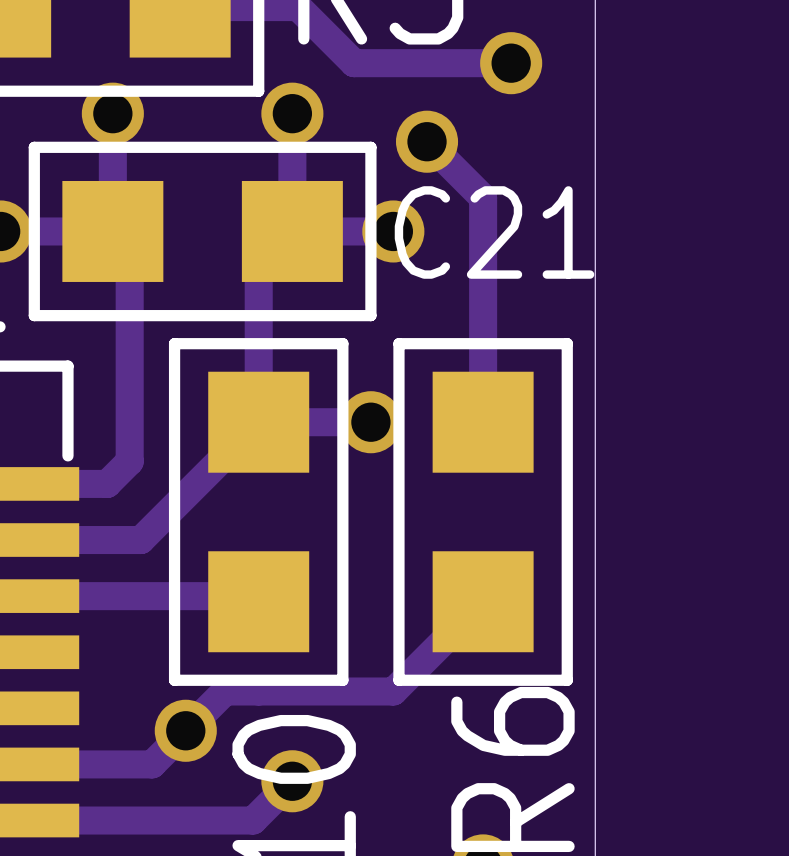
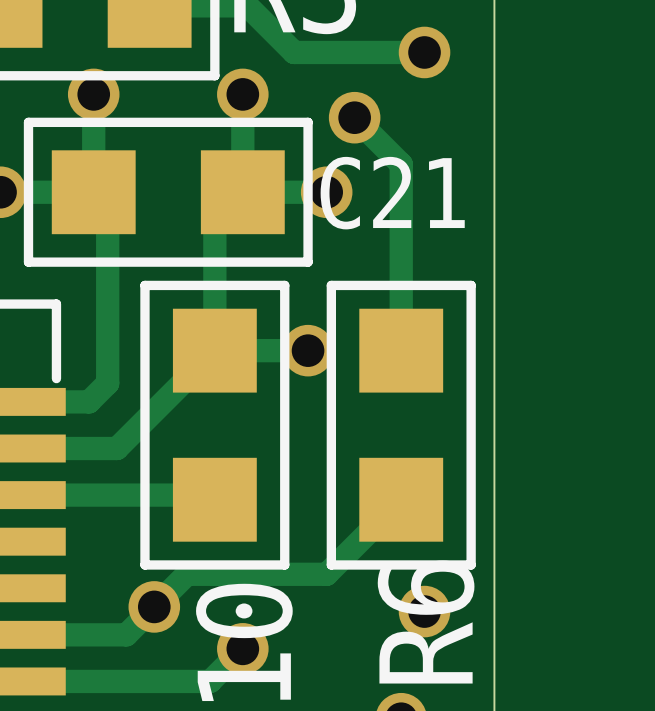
via: none -> (424, 611)

